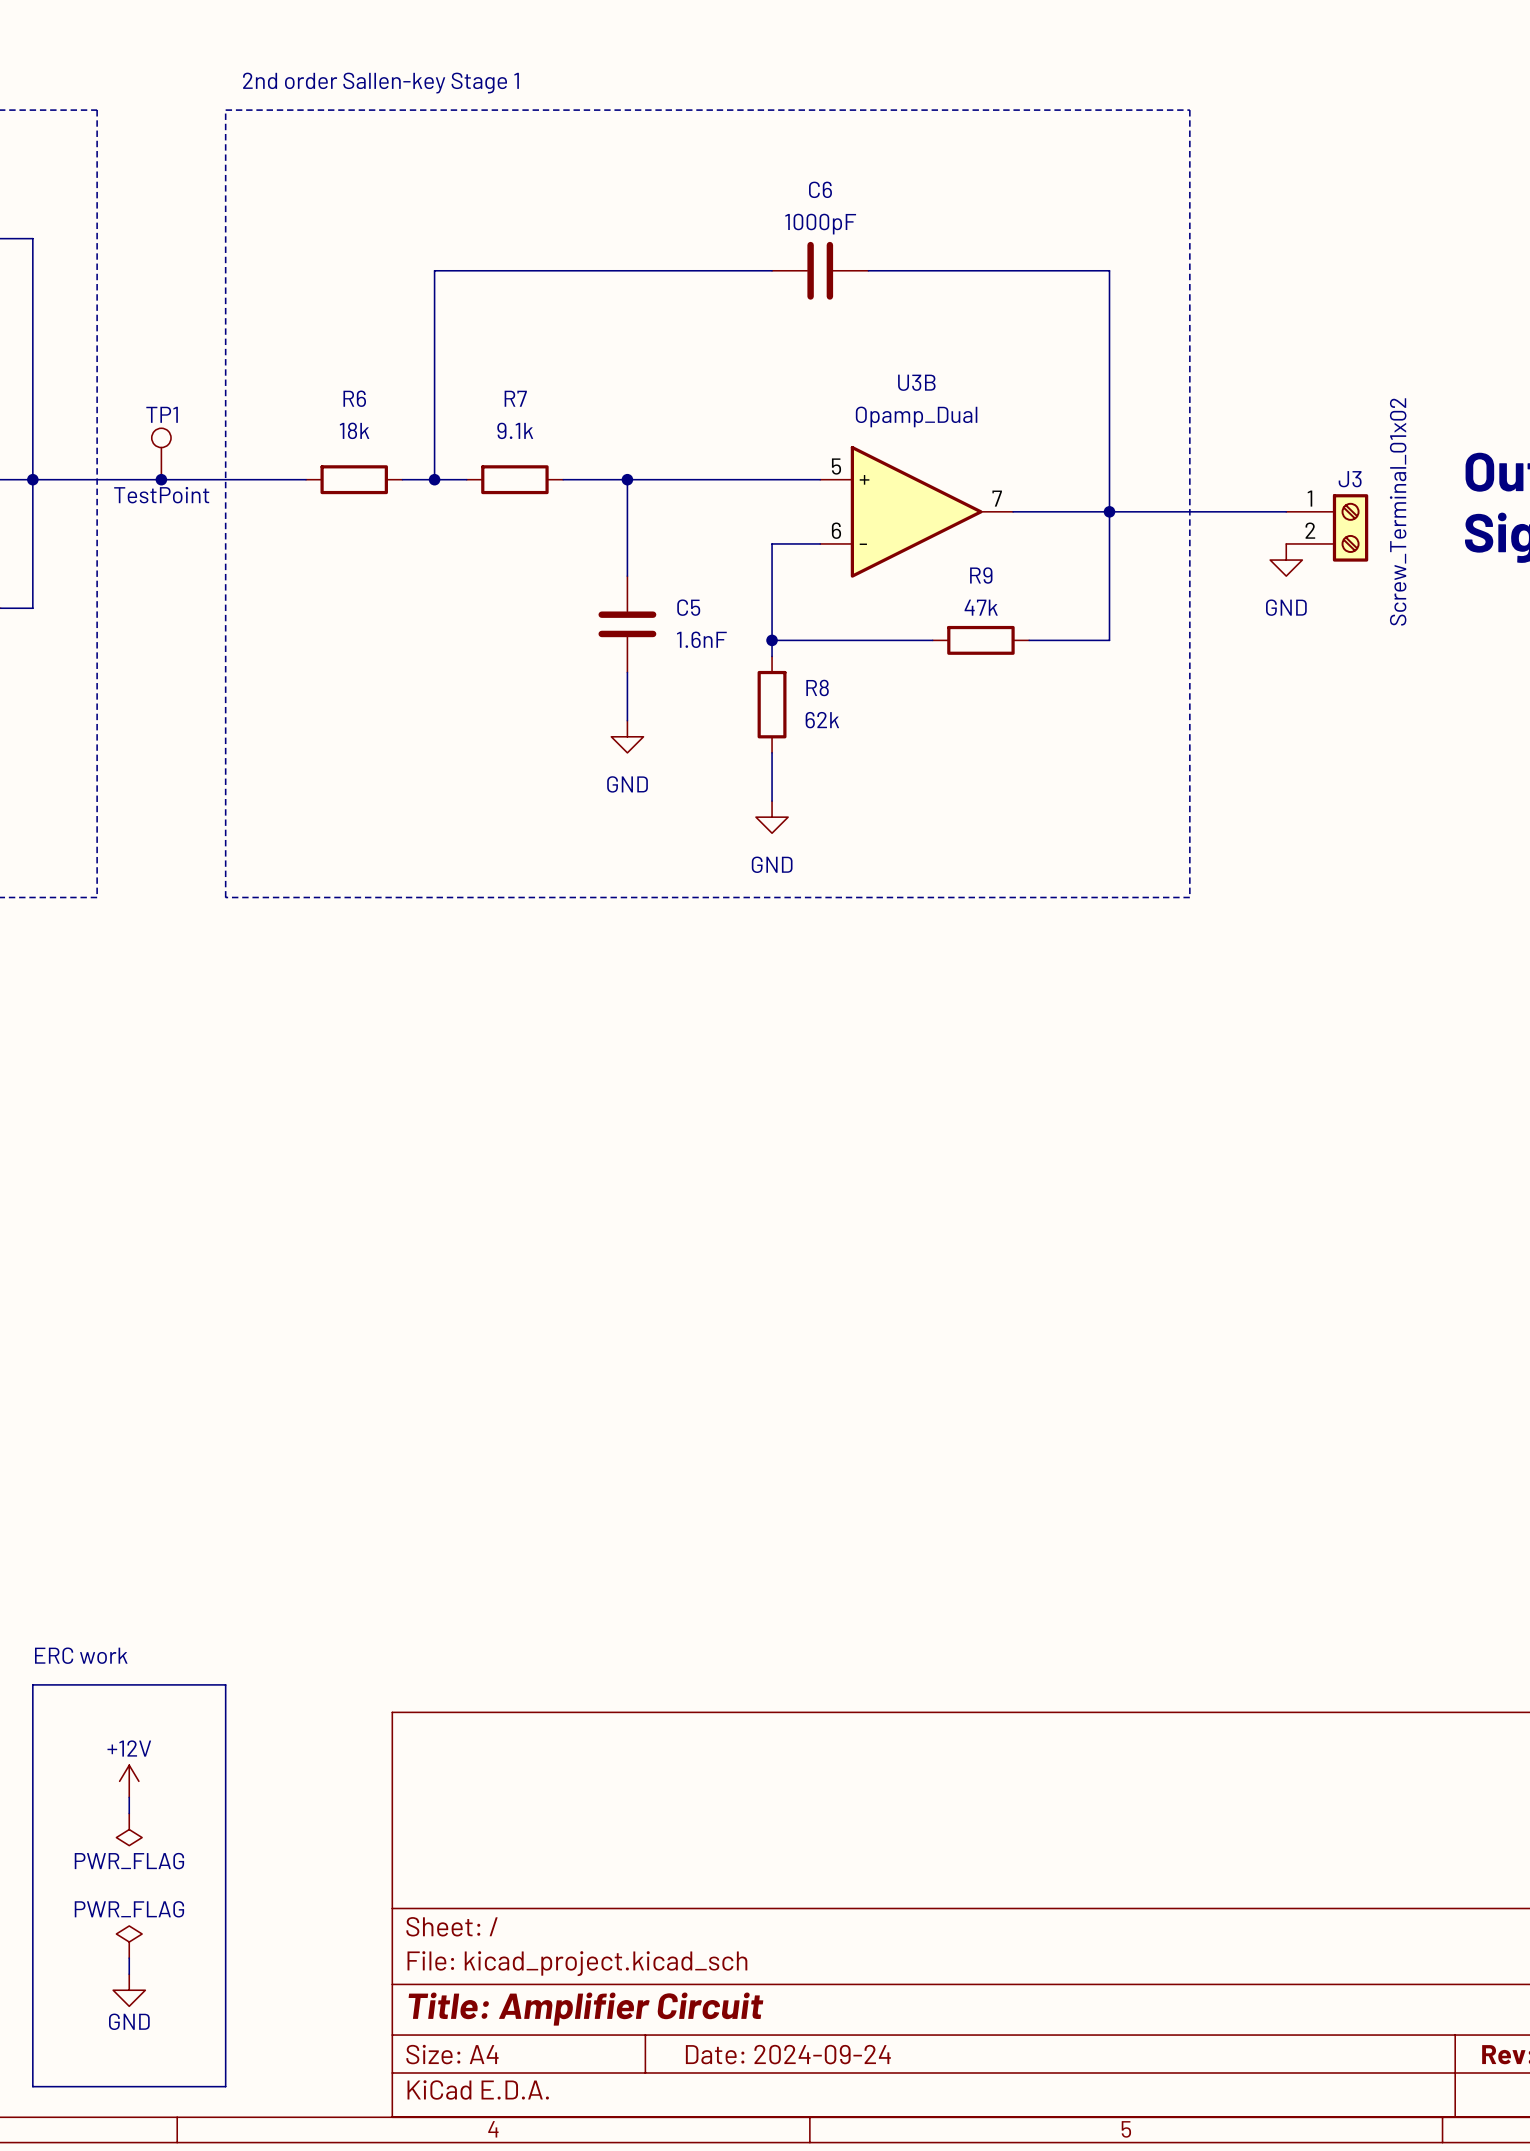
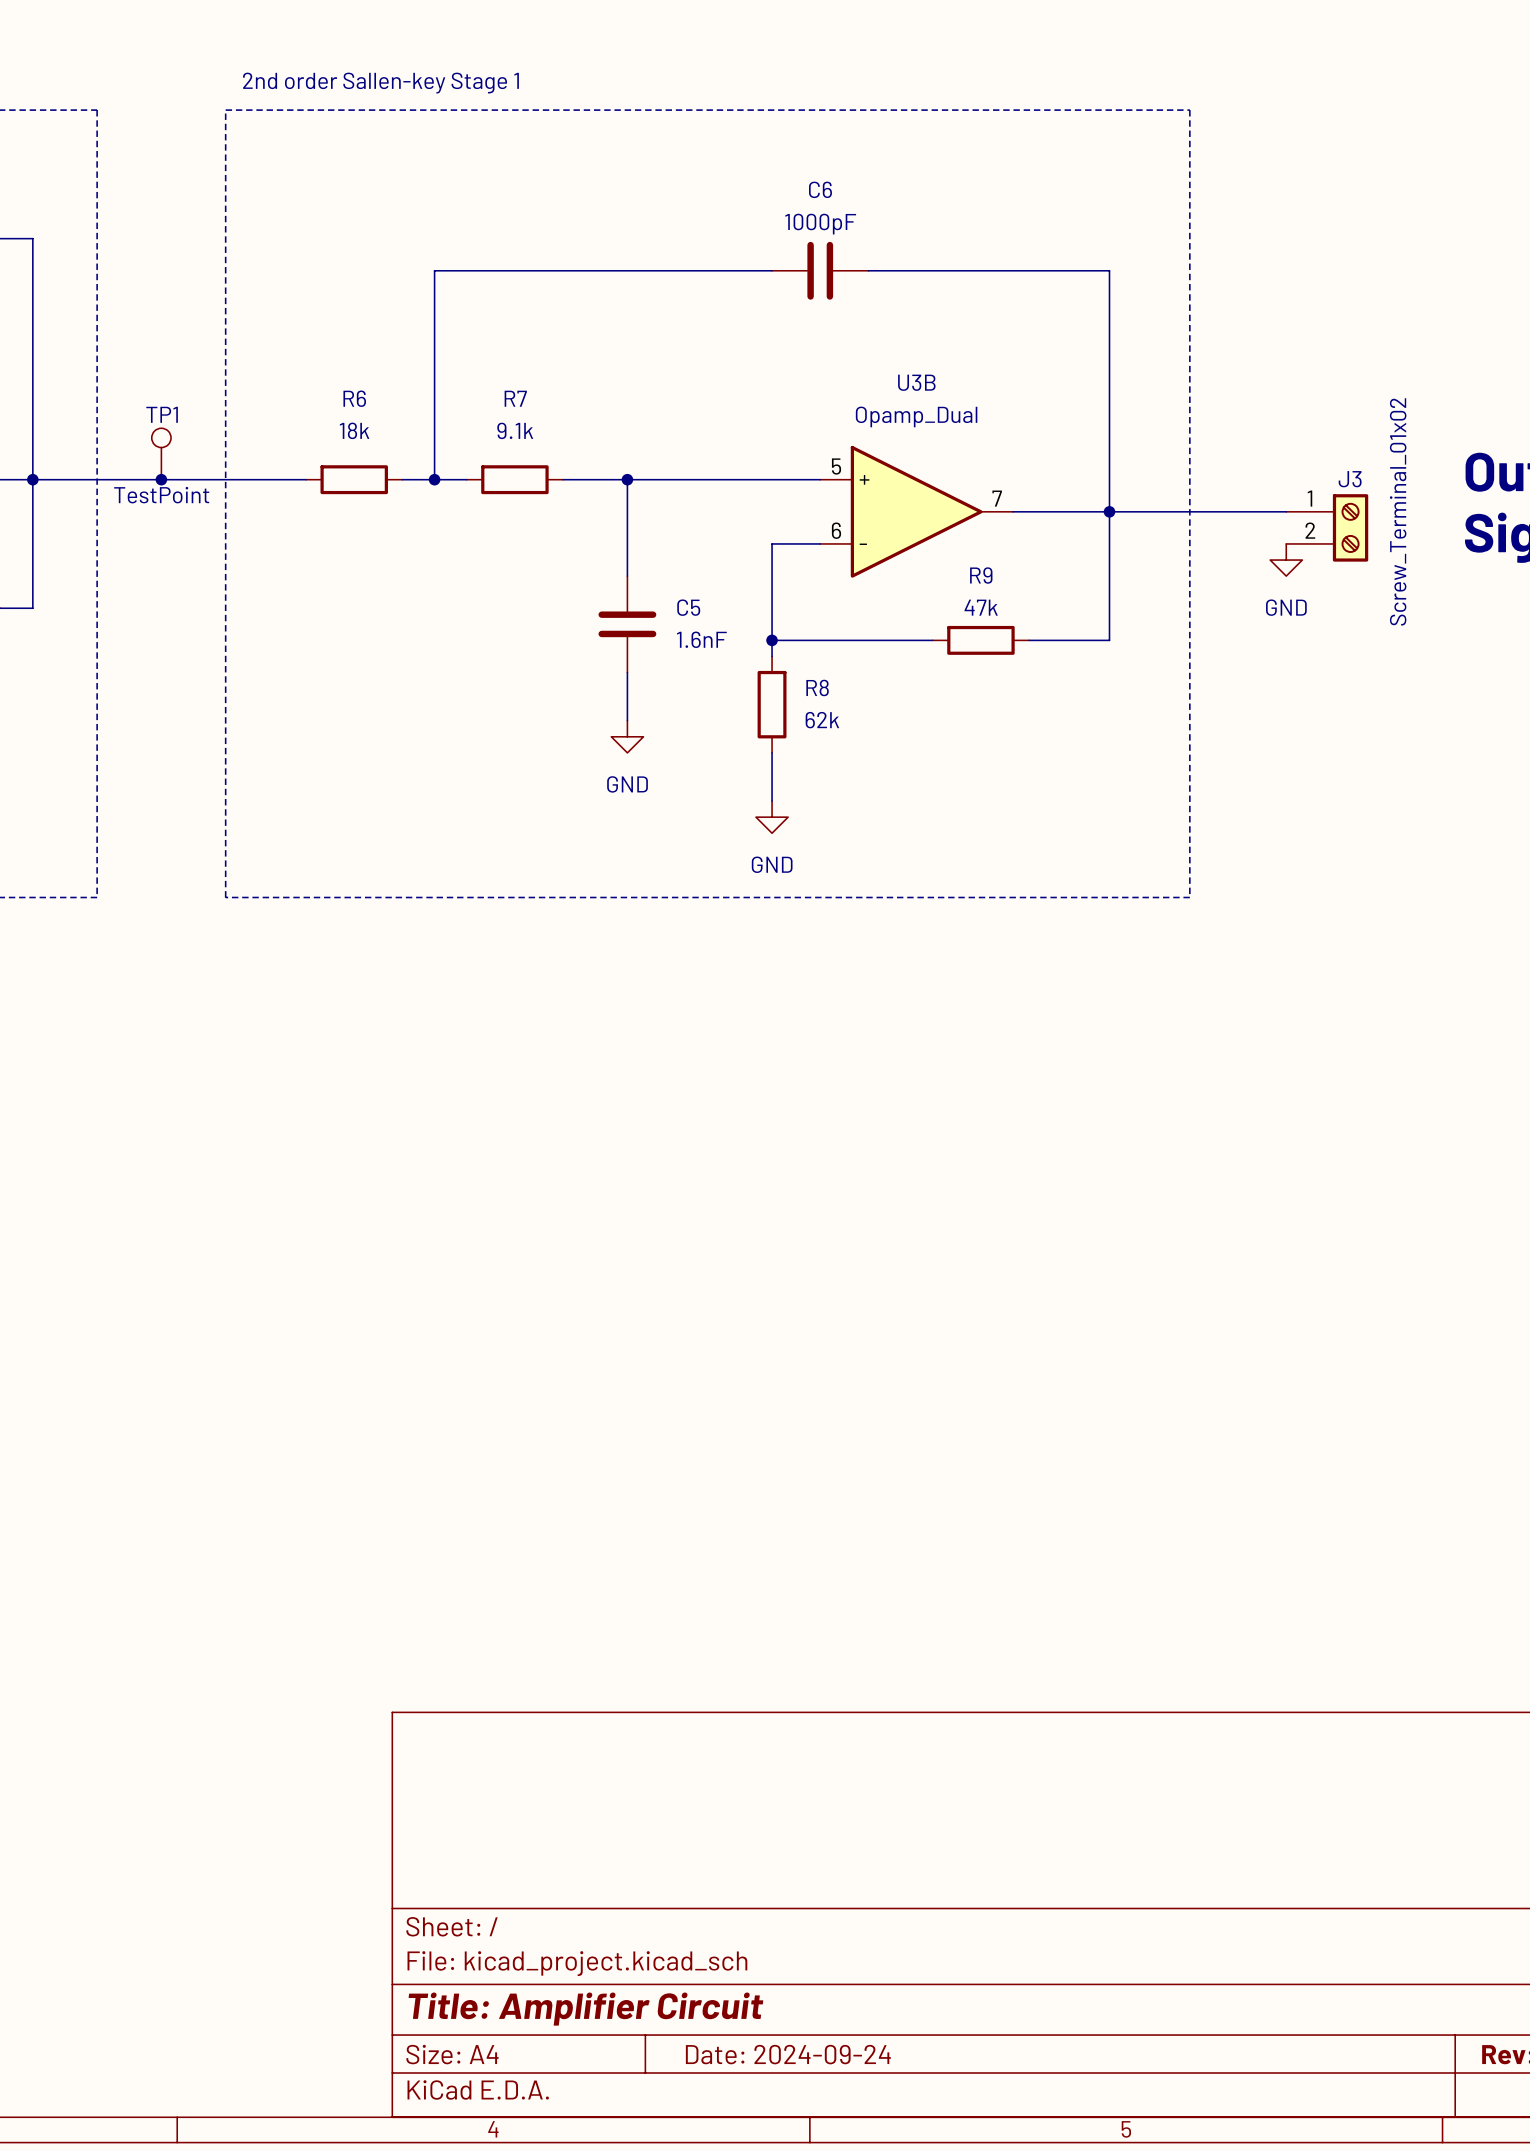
text: ERC work (81, 1655) -> none
line: (32, 1684) (225, 1684) (225, 2086) (32, 2086) (32, 1684) -> none
power symbol: +12V (129, 1781) -> none
wire: (129, 1797) (129, 1813) -> none
power symbol: PWR_FLAG (129, 1829) -> none
power symbol: PWR_FLAG (129, 1942) -> none
wire: (129, 1958) (129, 1974) -> none
power symbol: GND (129, 1990) -> none

